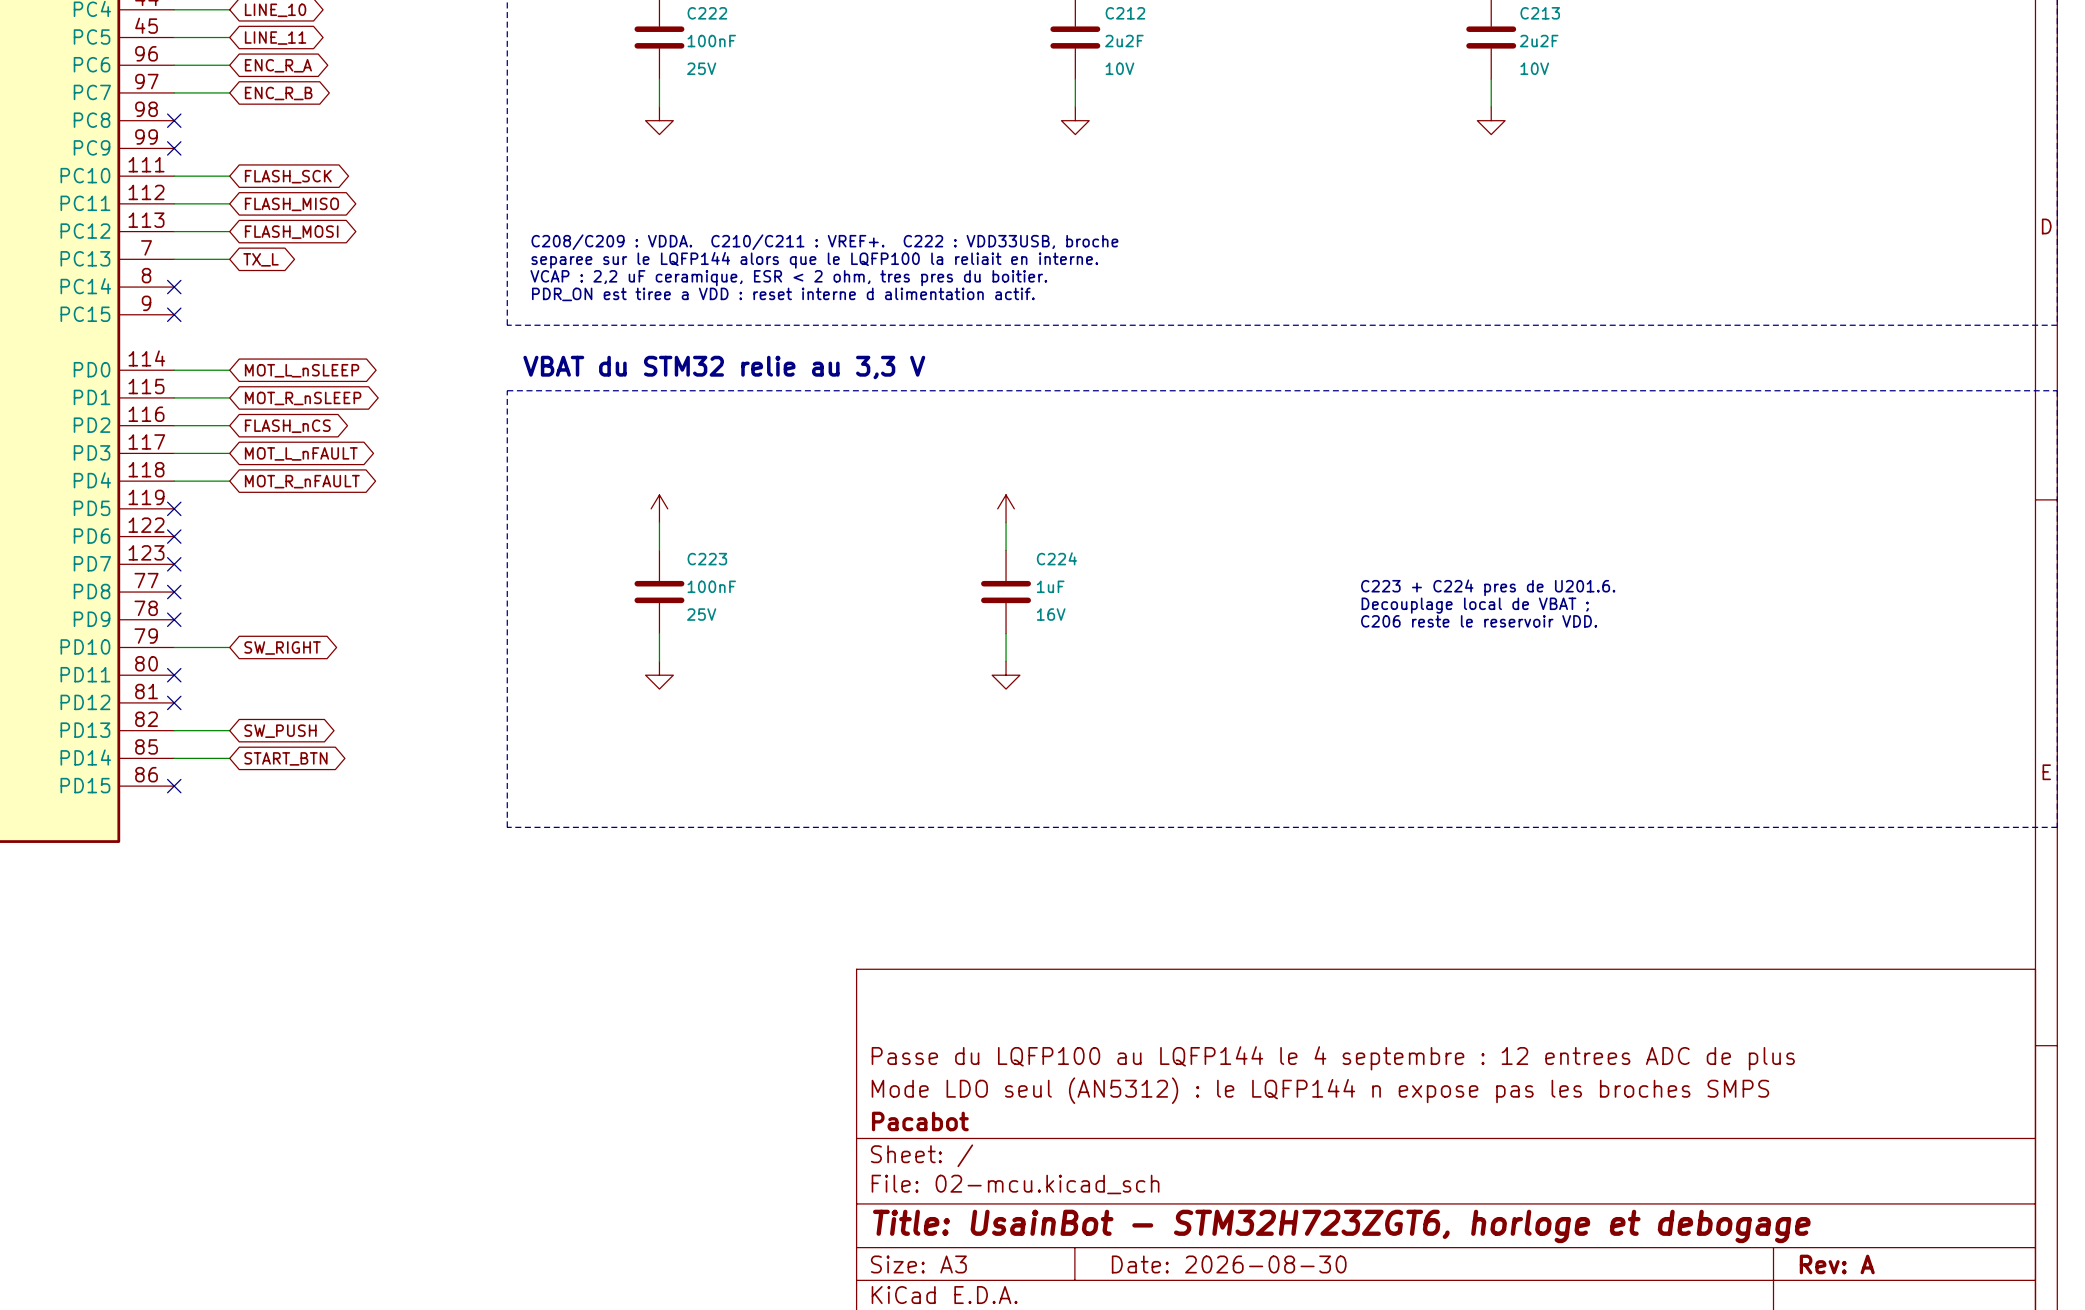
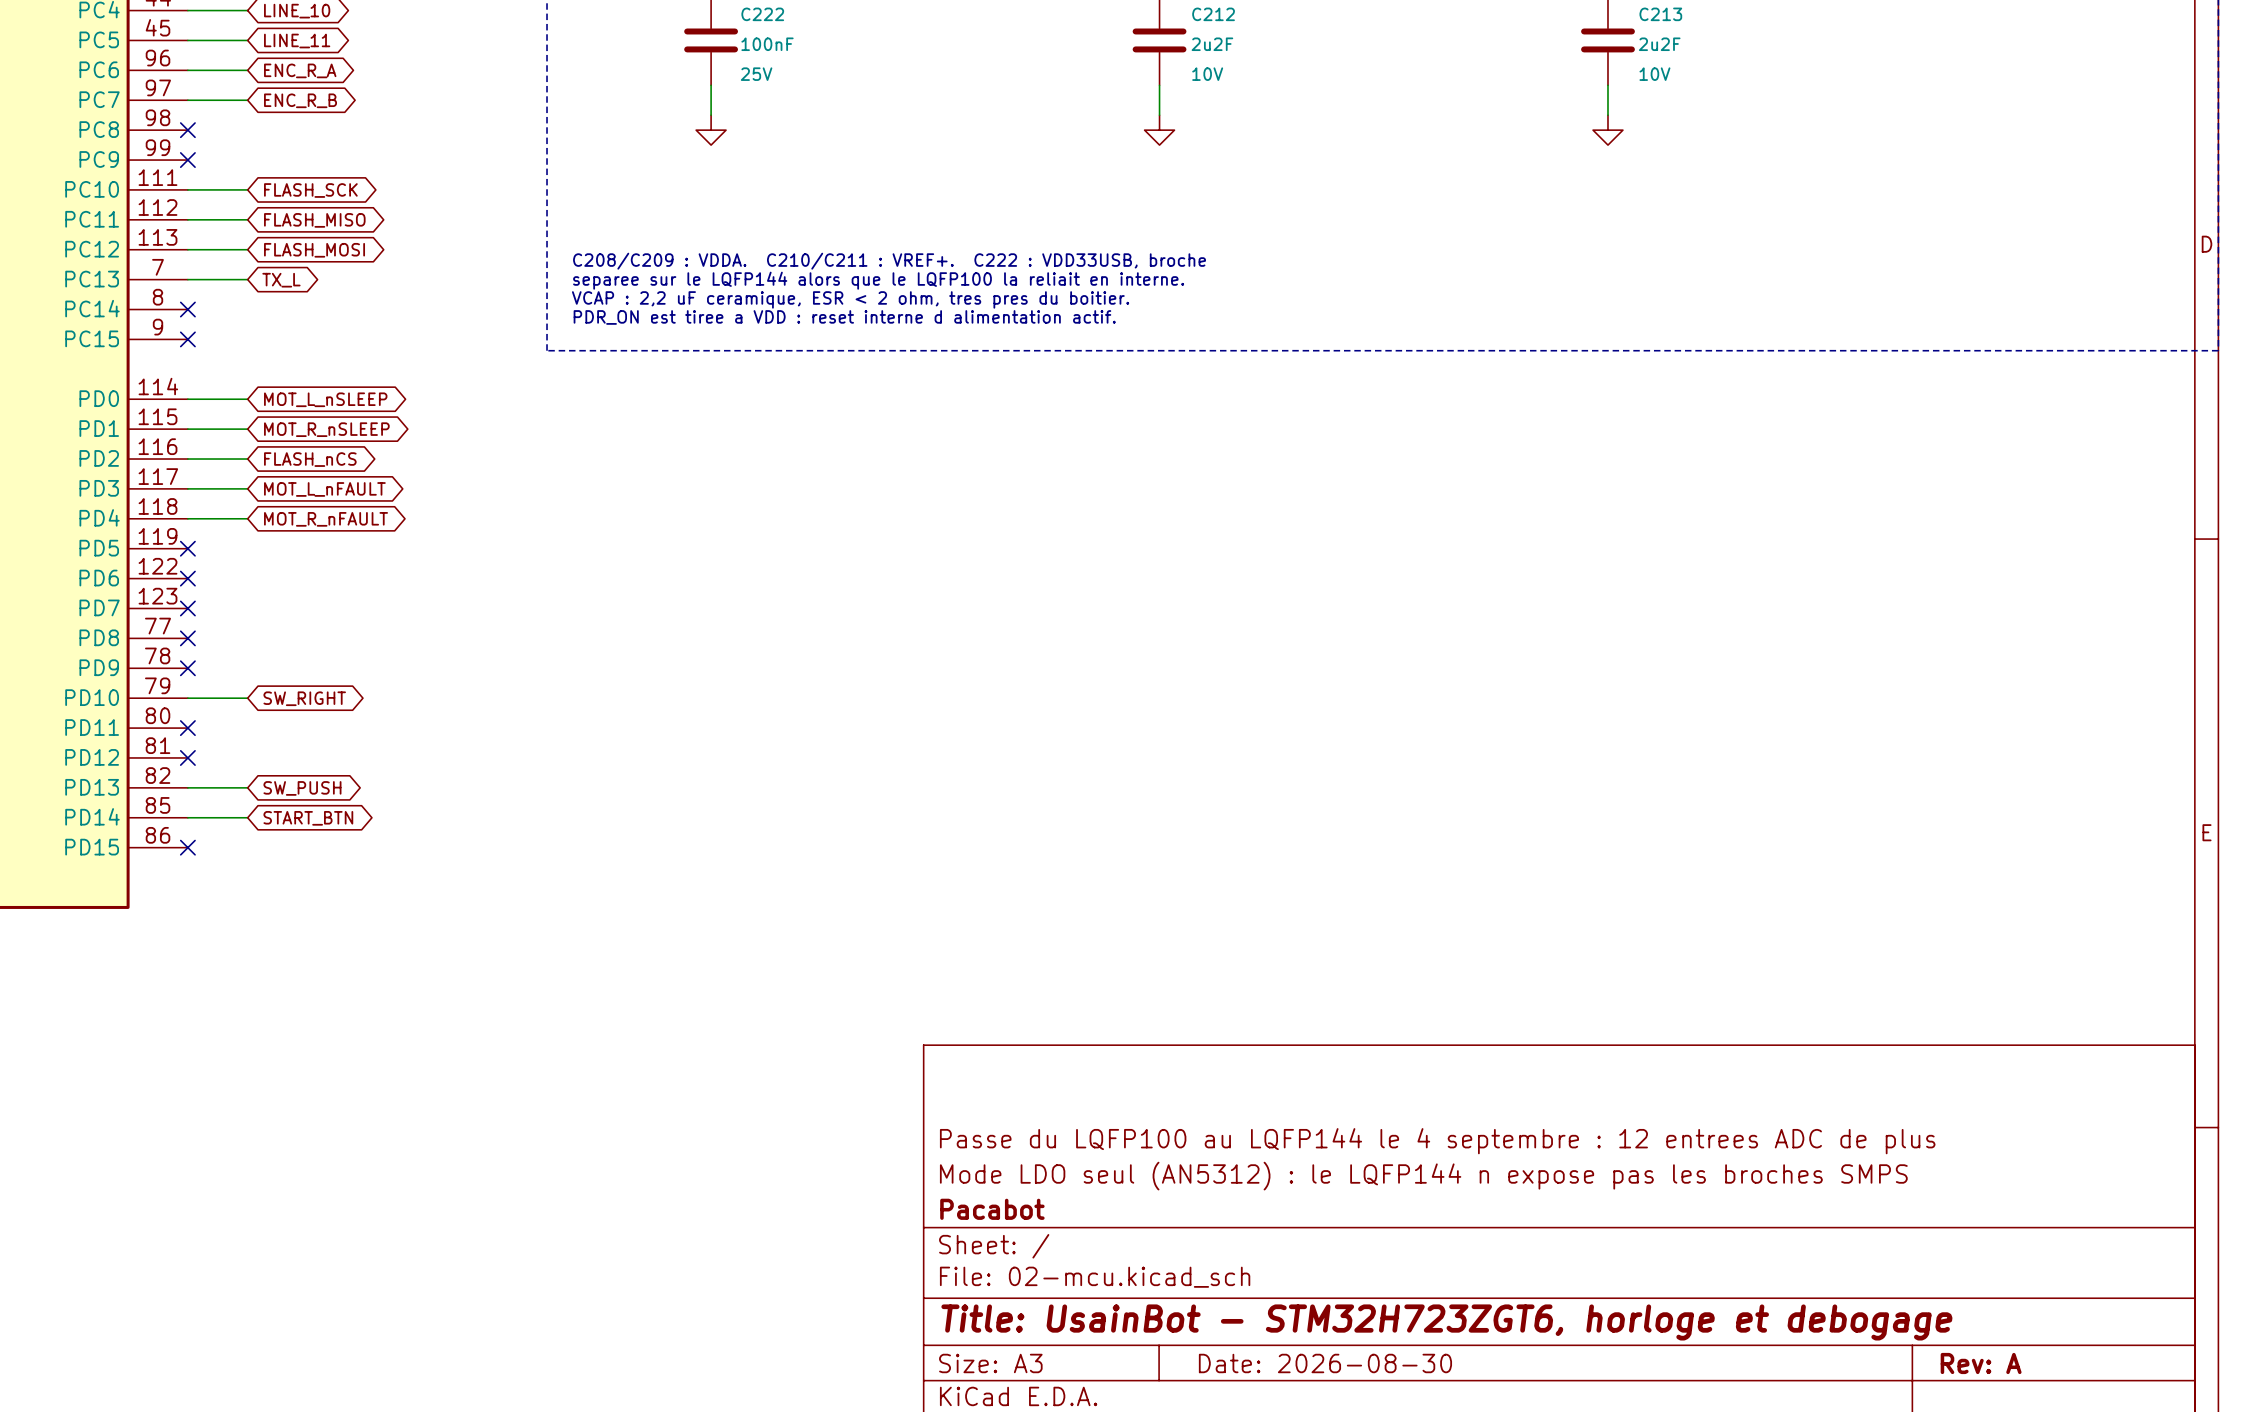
text: VBAT du STM32 relie au 3,3 V (724, 367) -> none
line: (507, 390) (2057, 390) (2057, 827) (507, 827) (507, 390) -> none
power symbol: (659, 508) -> none
power symbol: (1006, 508) -> none
wire: (659, 522) (659, 550) -> none
wire: (1006, 522) (1006, 550) -> none
text: C223 + C224 pres de U201.6. (1488, 587) -> none
C223: 100nF (659, 592) -> none
C224: 1uF (1006, 592) -> none
text: Decouplage local de VBAT ; (1475, 605) -> none
text: C206 reste le reservoir VDD. (1479, 621) -> none
wire: (659, 633) (659, 661) -> none
wire: (1006, 633) (1006, 661) -> none
power symbol: (659, 675) -> none
power symbol: (1006, 675) -> none

